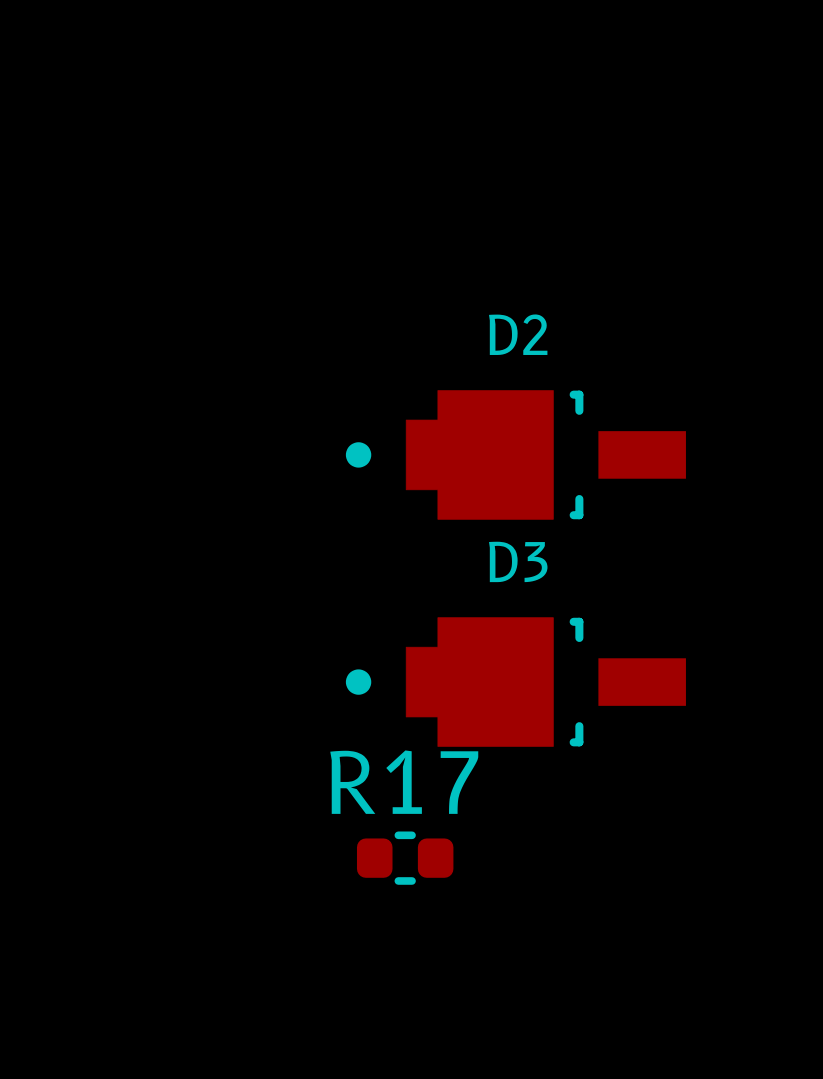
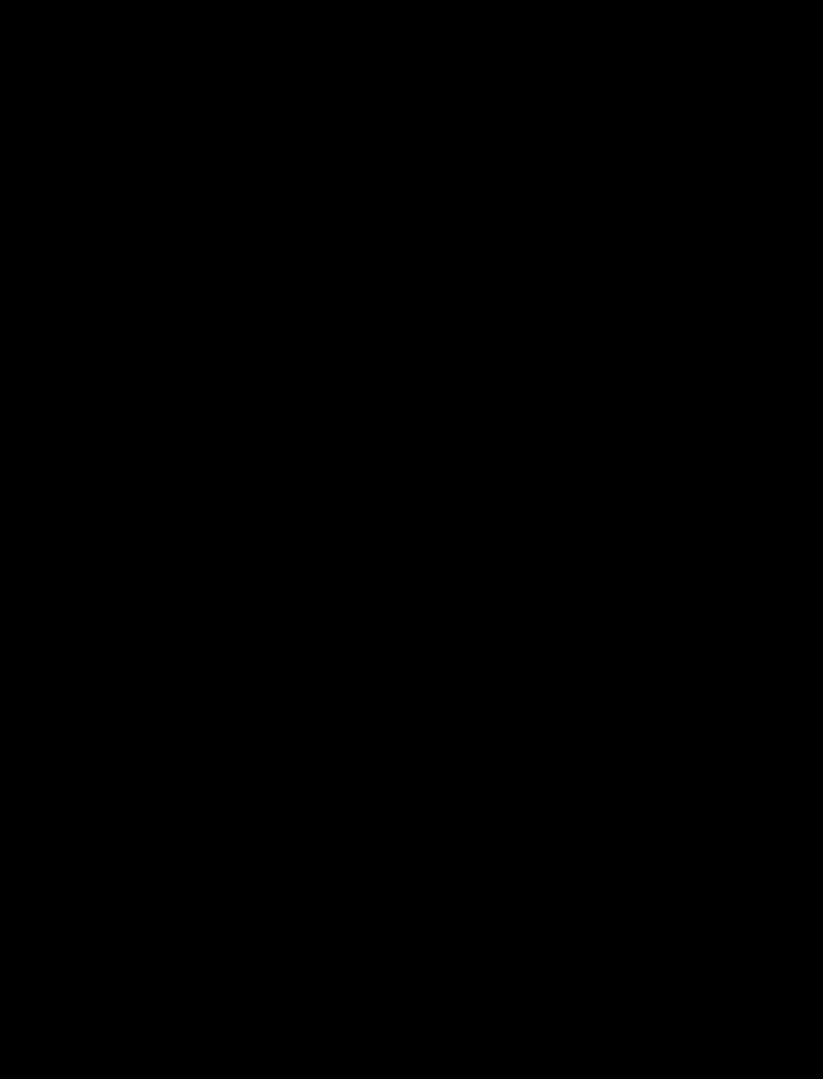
D2: (515, 454) -> none
D3: (515, 682) -> none
R17: (405, 858) -> none

